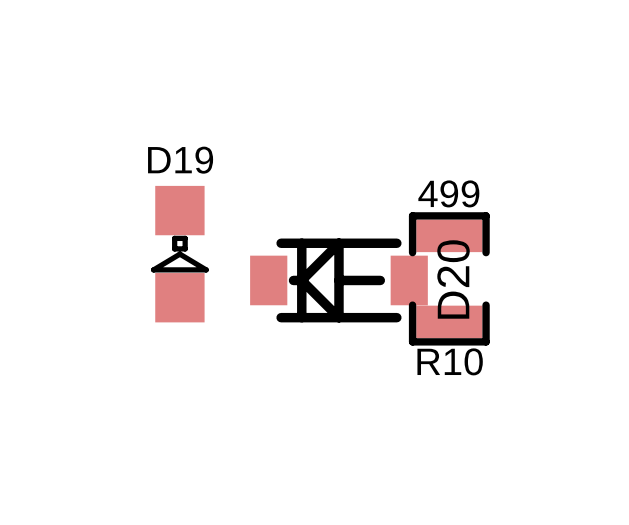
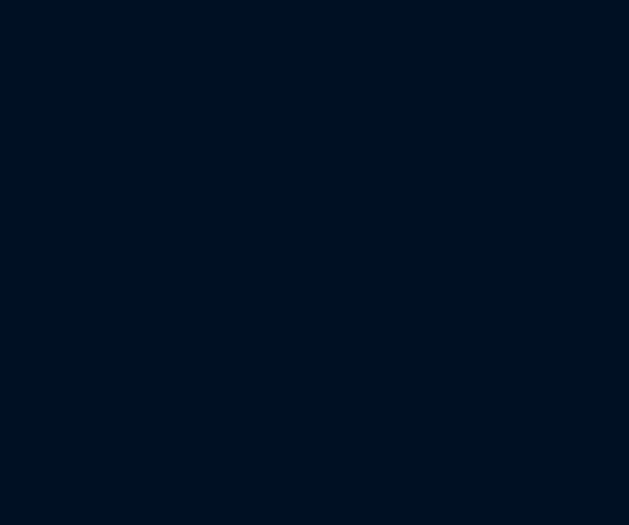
D19: (179, 254) -> none
R10: 499 (449, 278) -> none
D20: (338, 280) -> none

